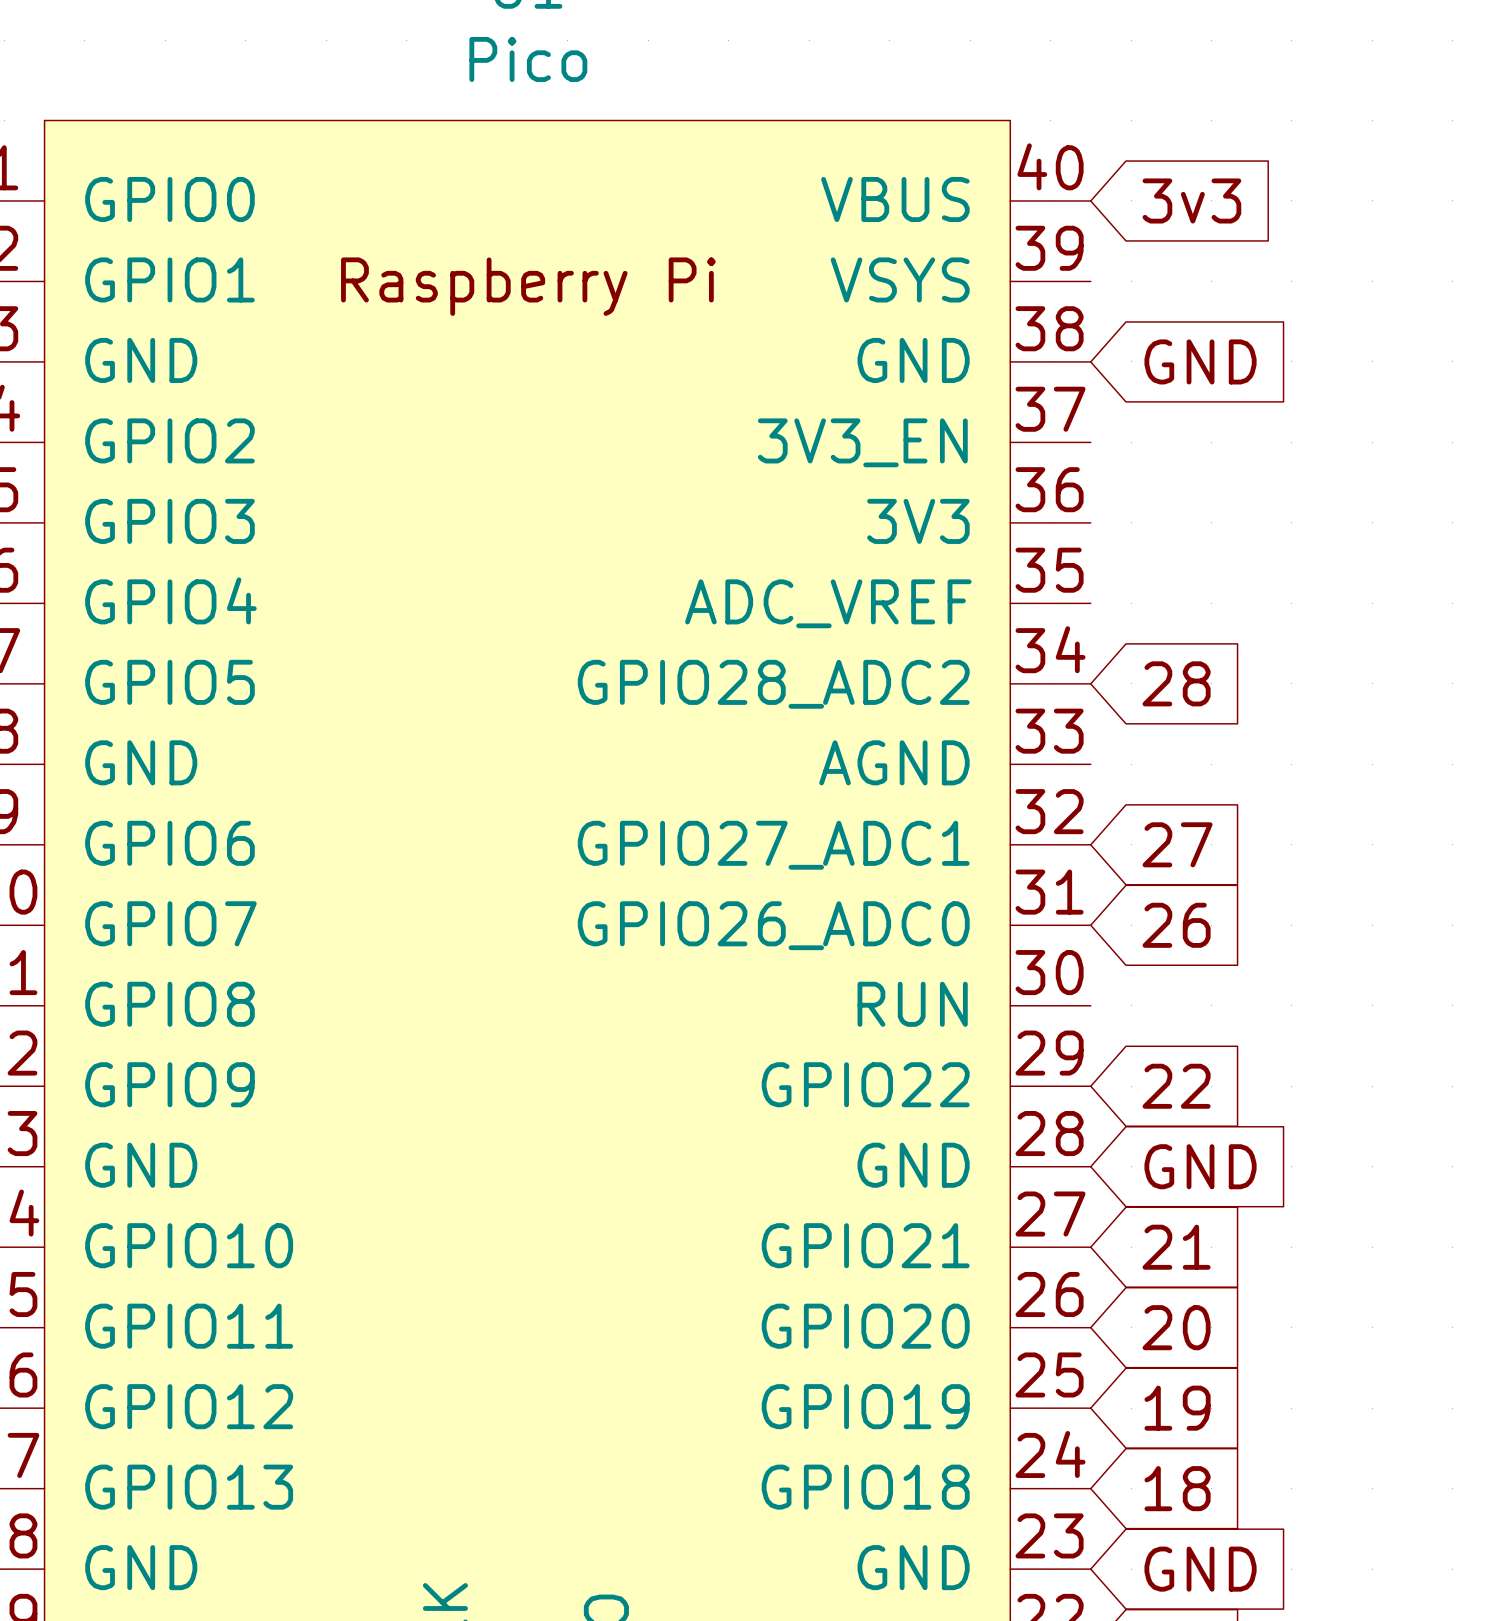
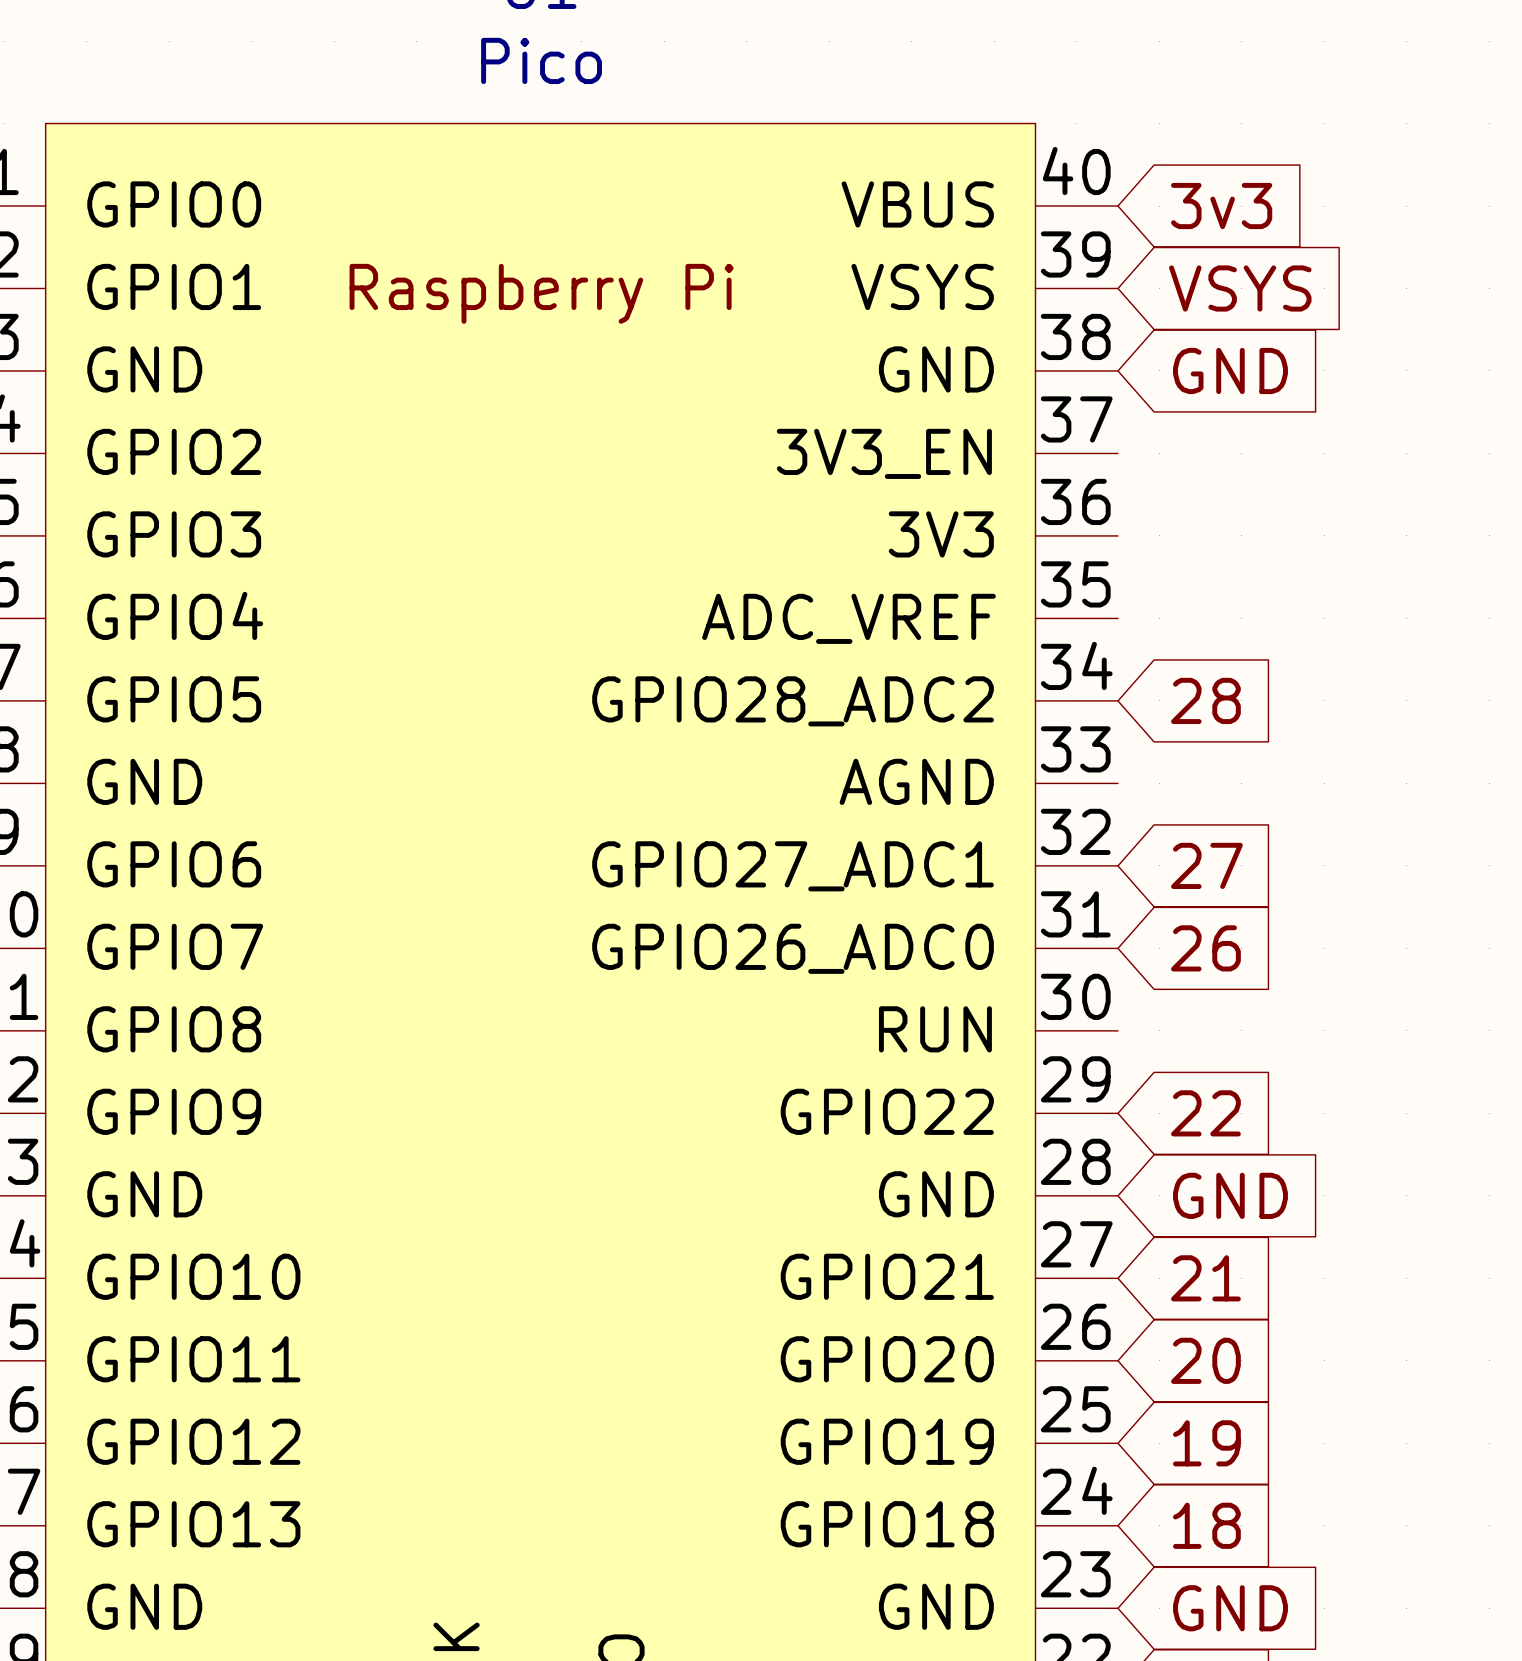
global label: none -> VSYS (1240, 288)

